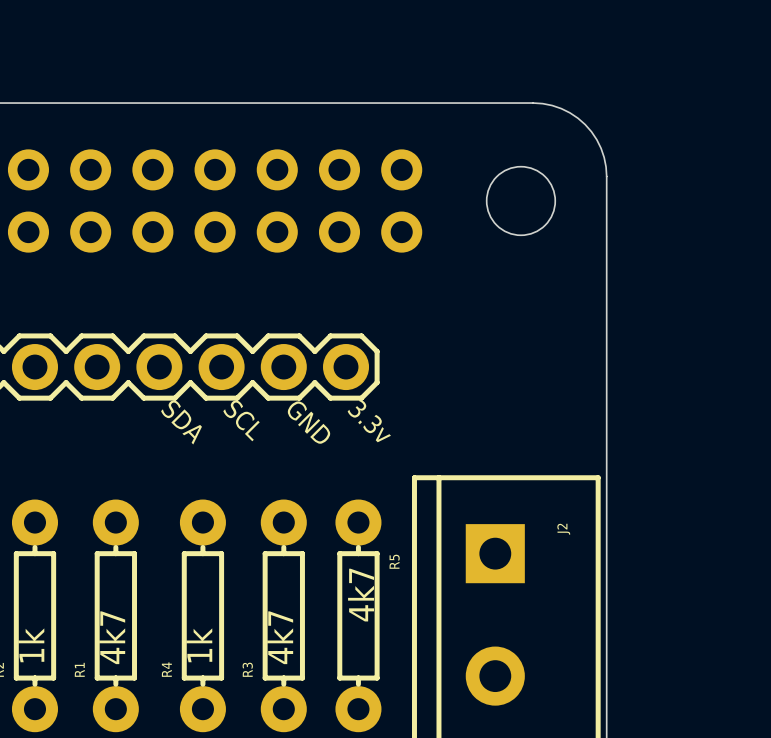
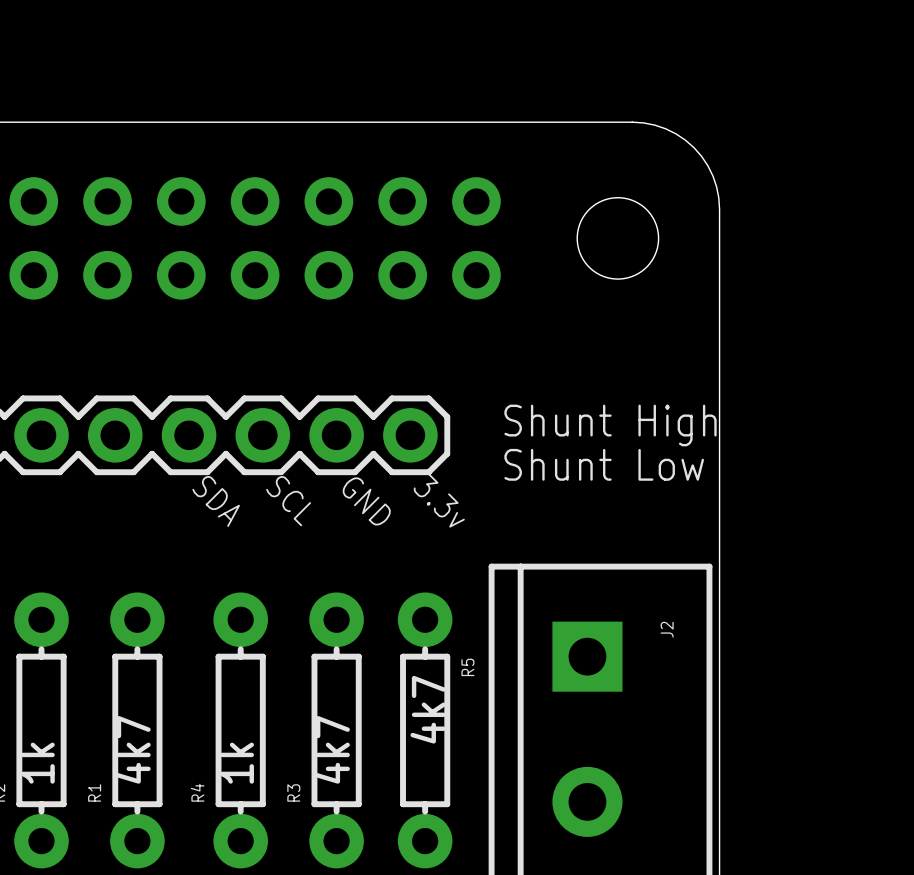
text: none -> Shunt High (610, 425)
text: none -> Shunt Low (604, 464)

